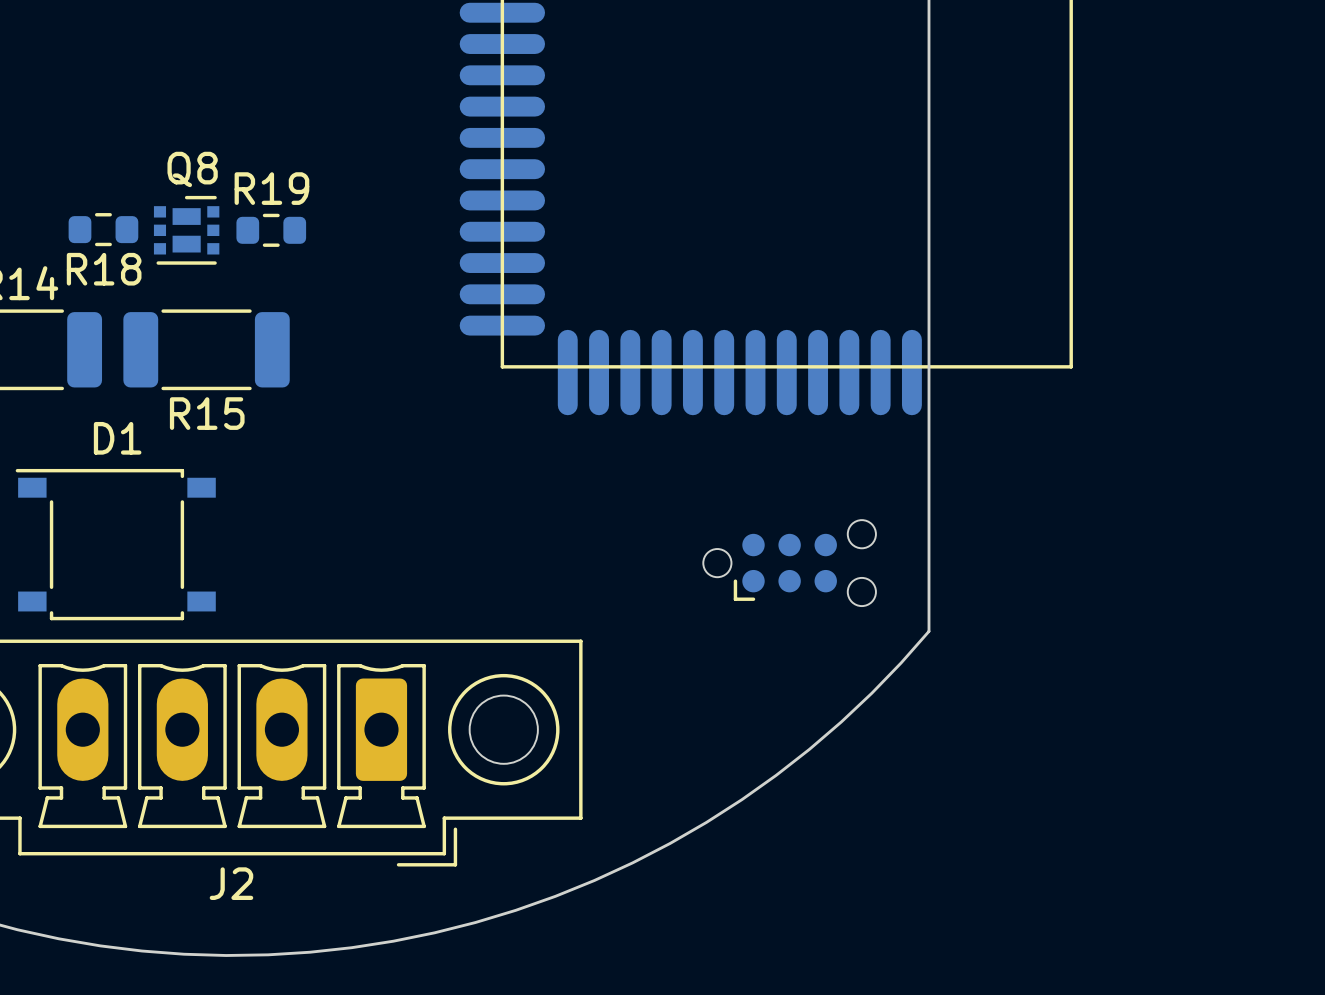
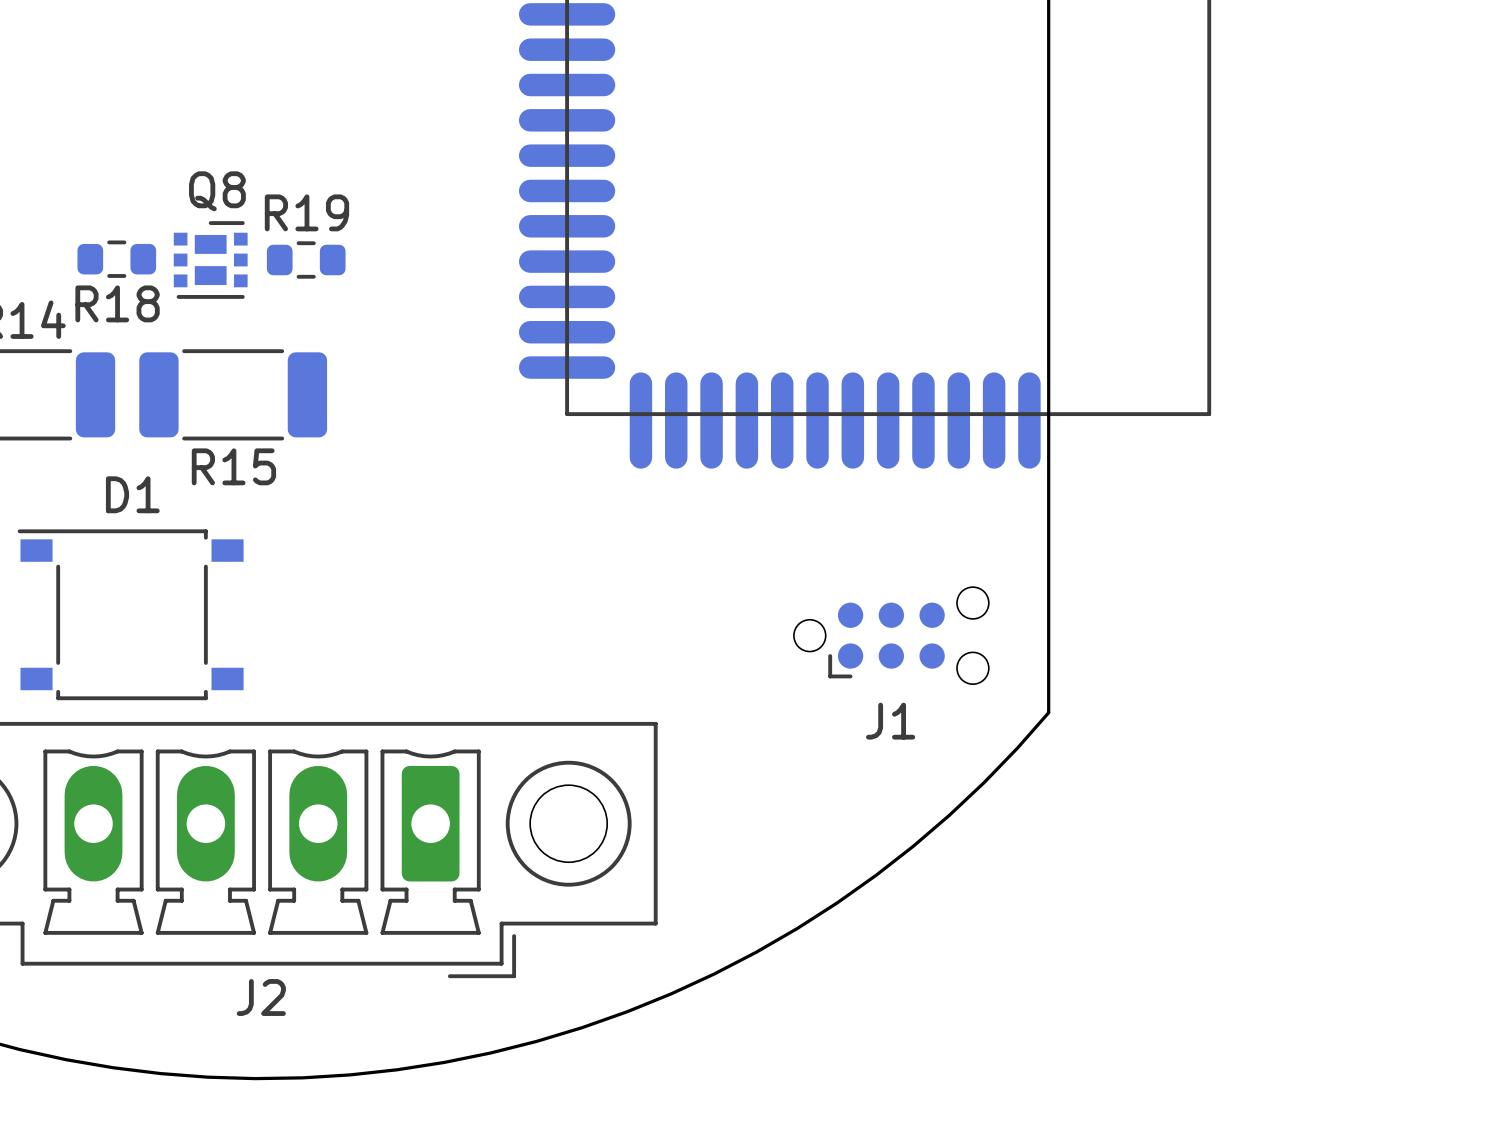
J1 name: none -> J1 (890, 721)

